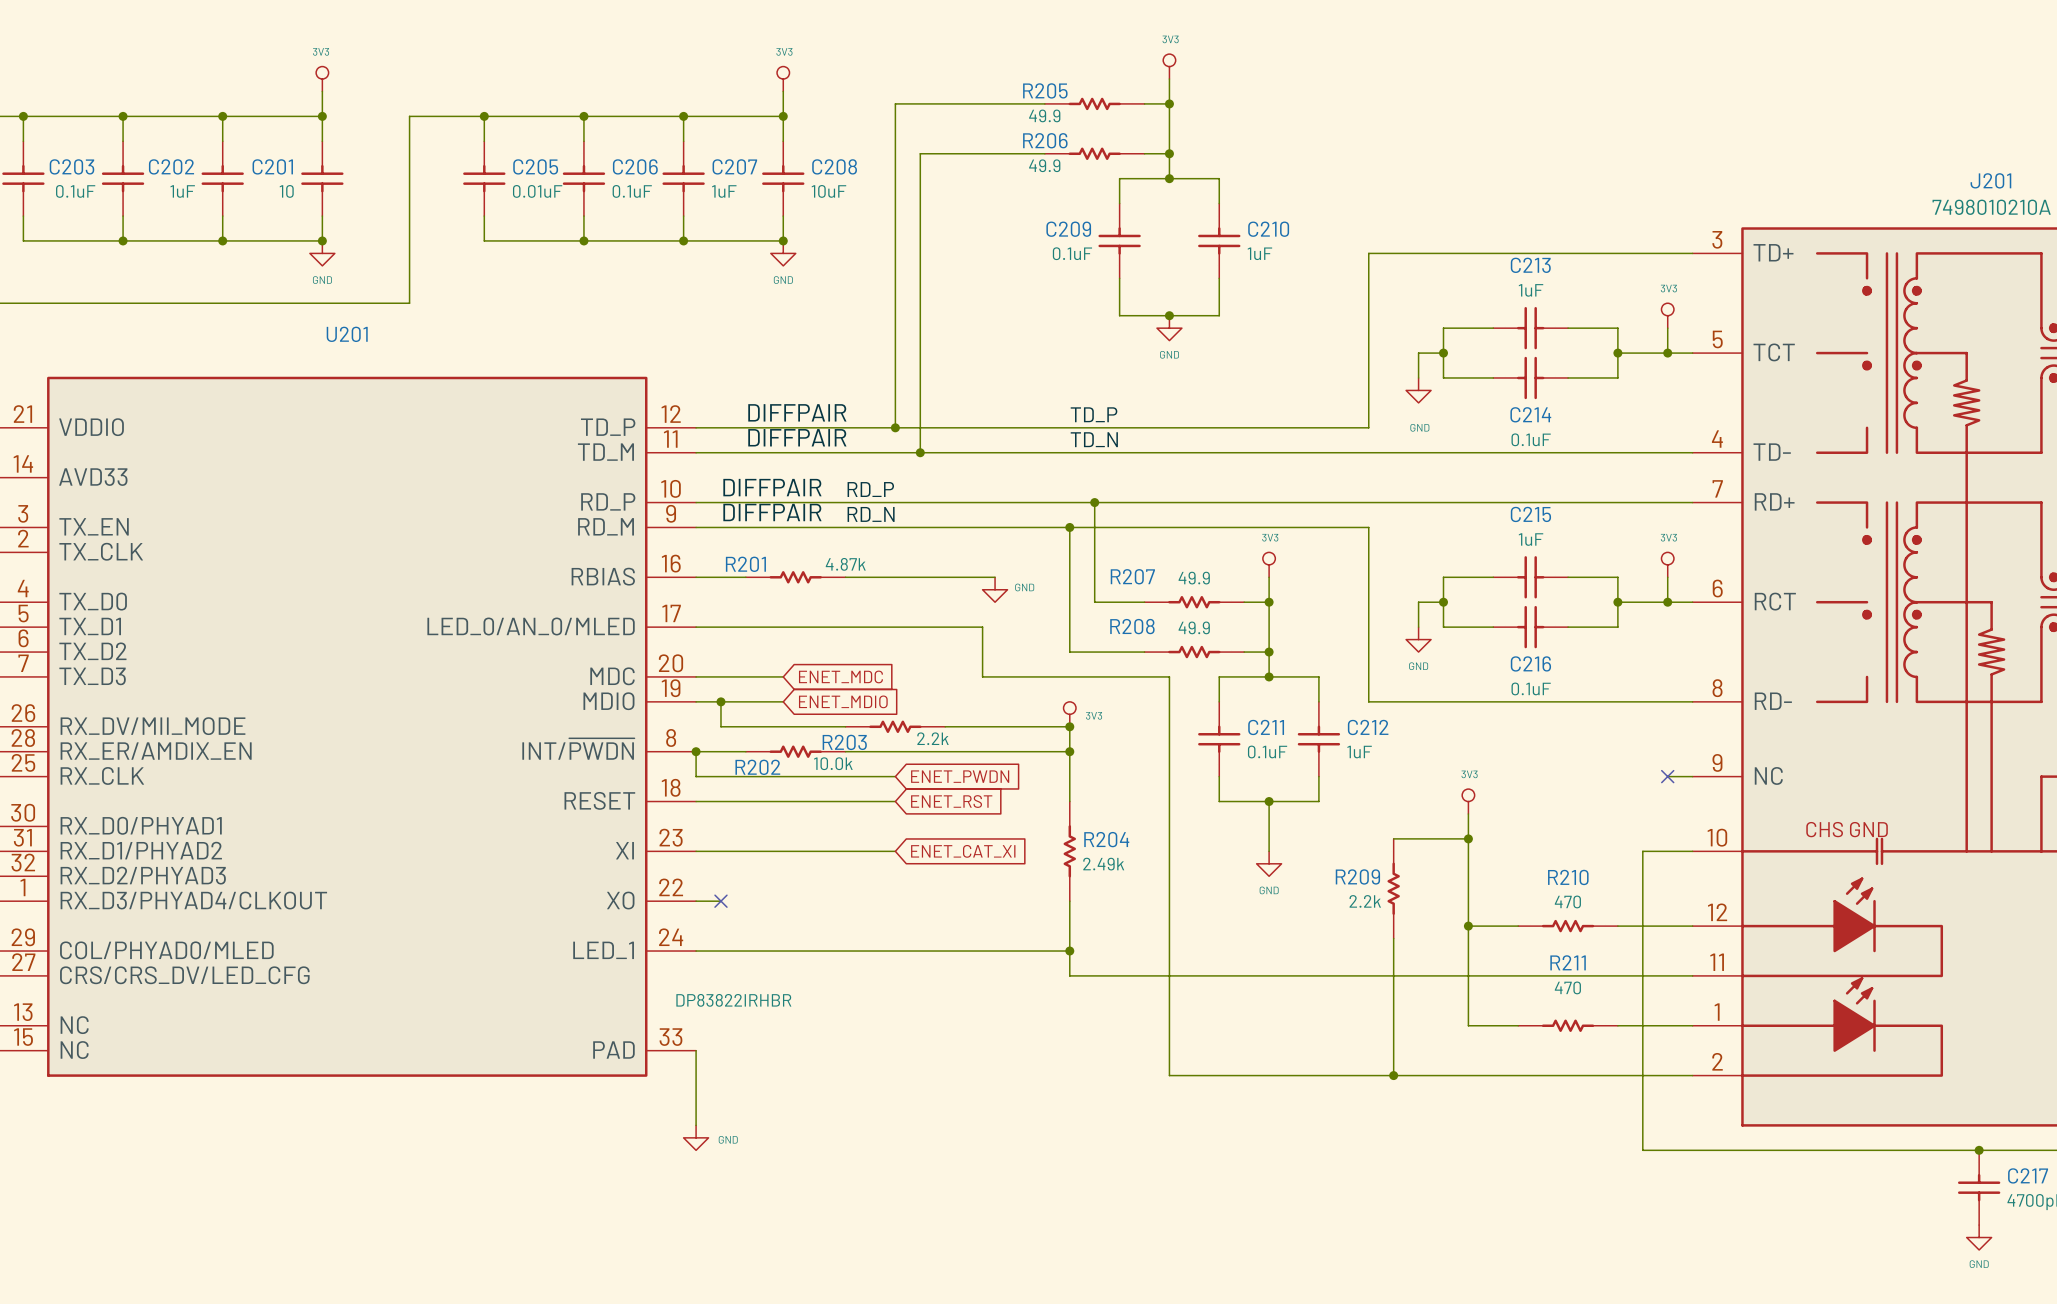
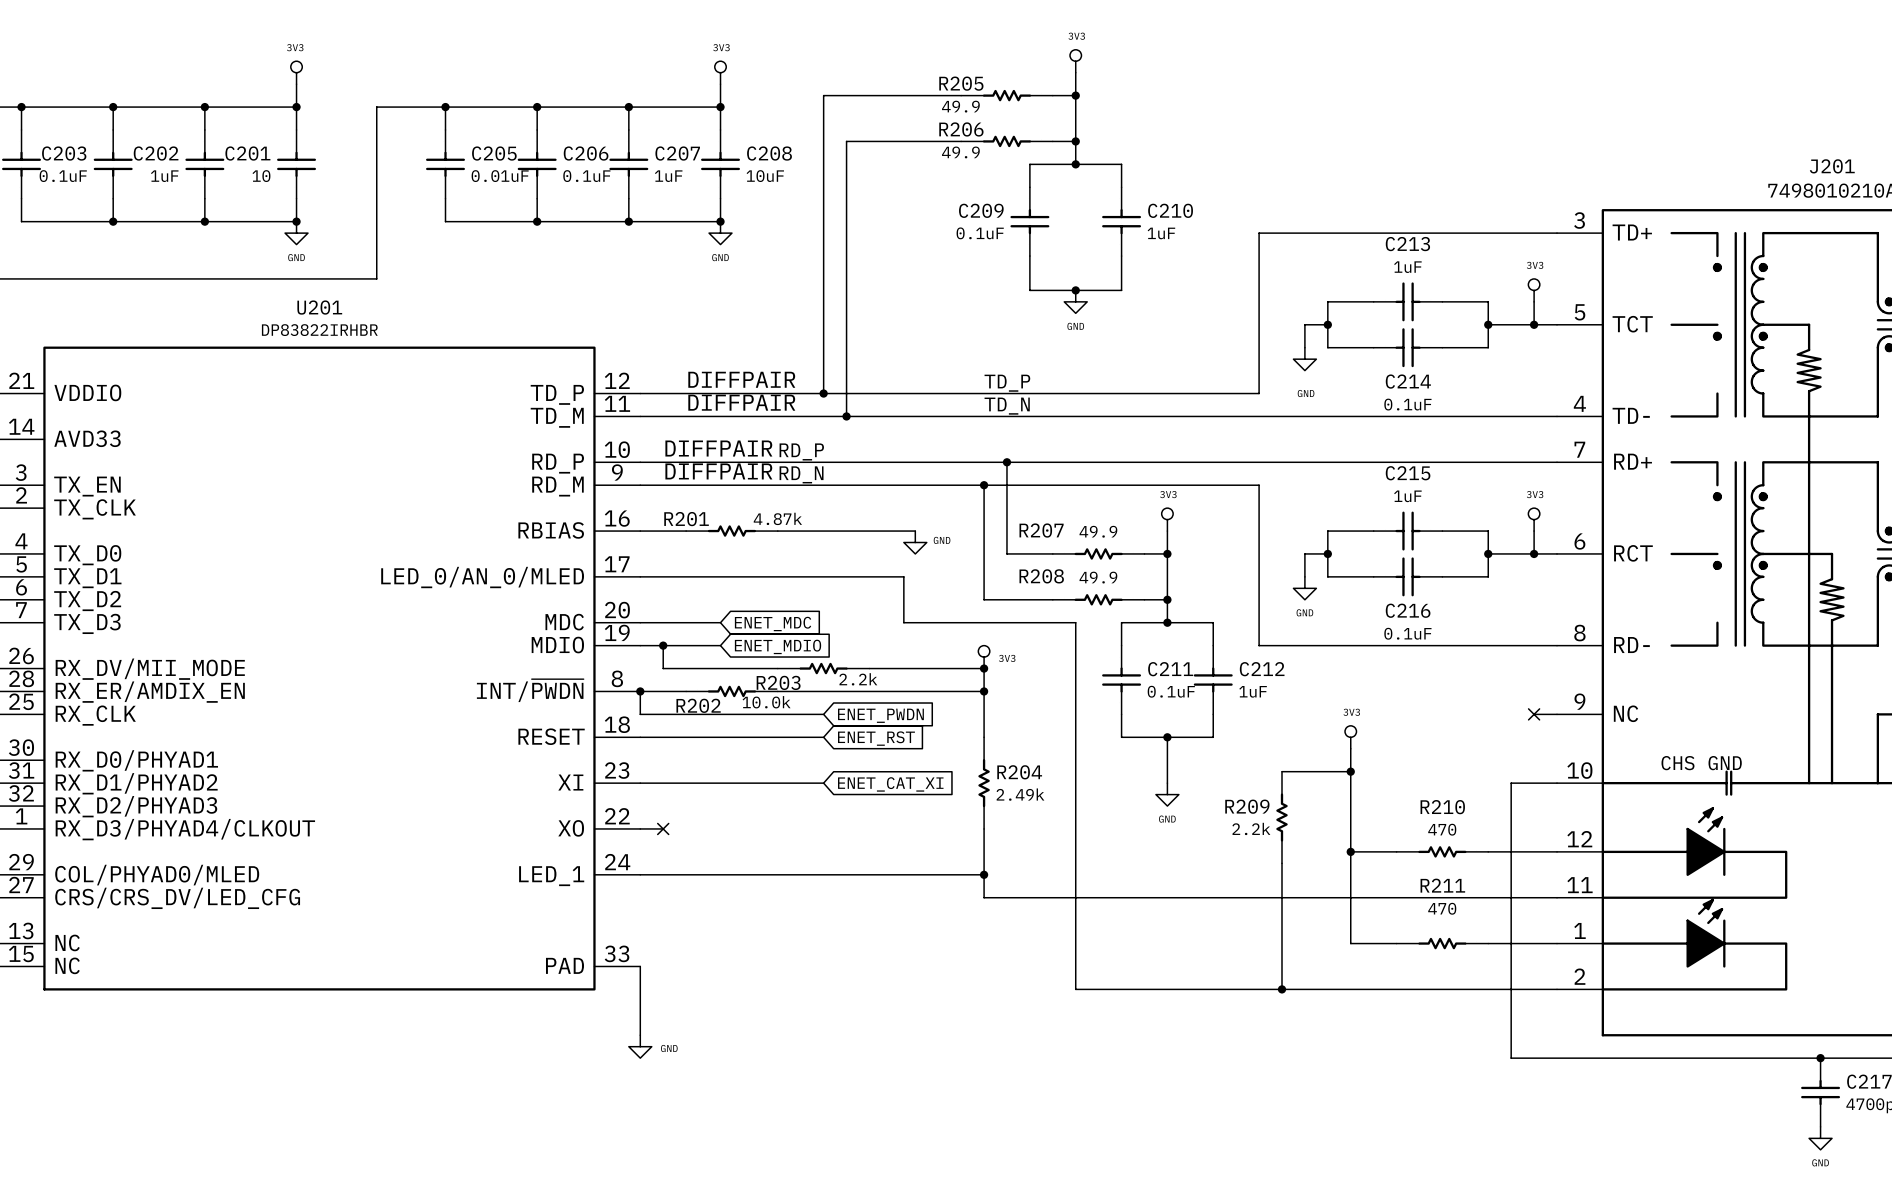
U201 value position: DP83822IRHBR (733, 1000) -> DP83822IRHBR (319, 330)

